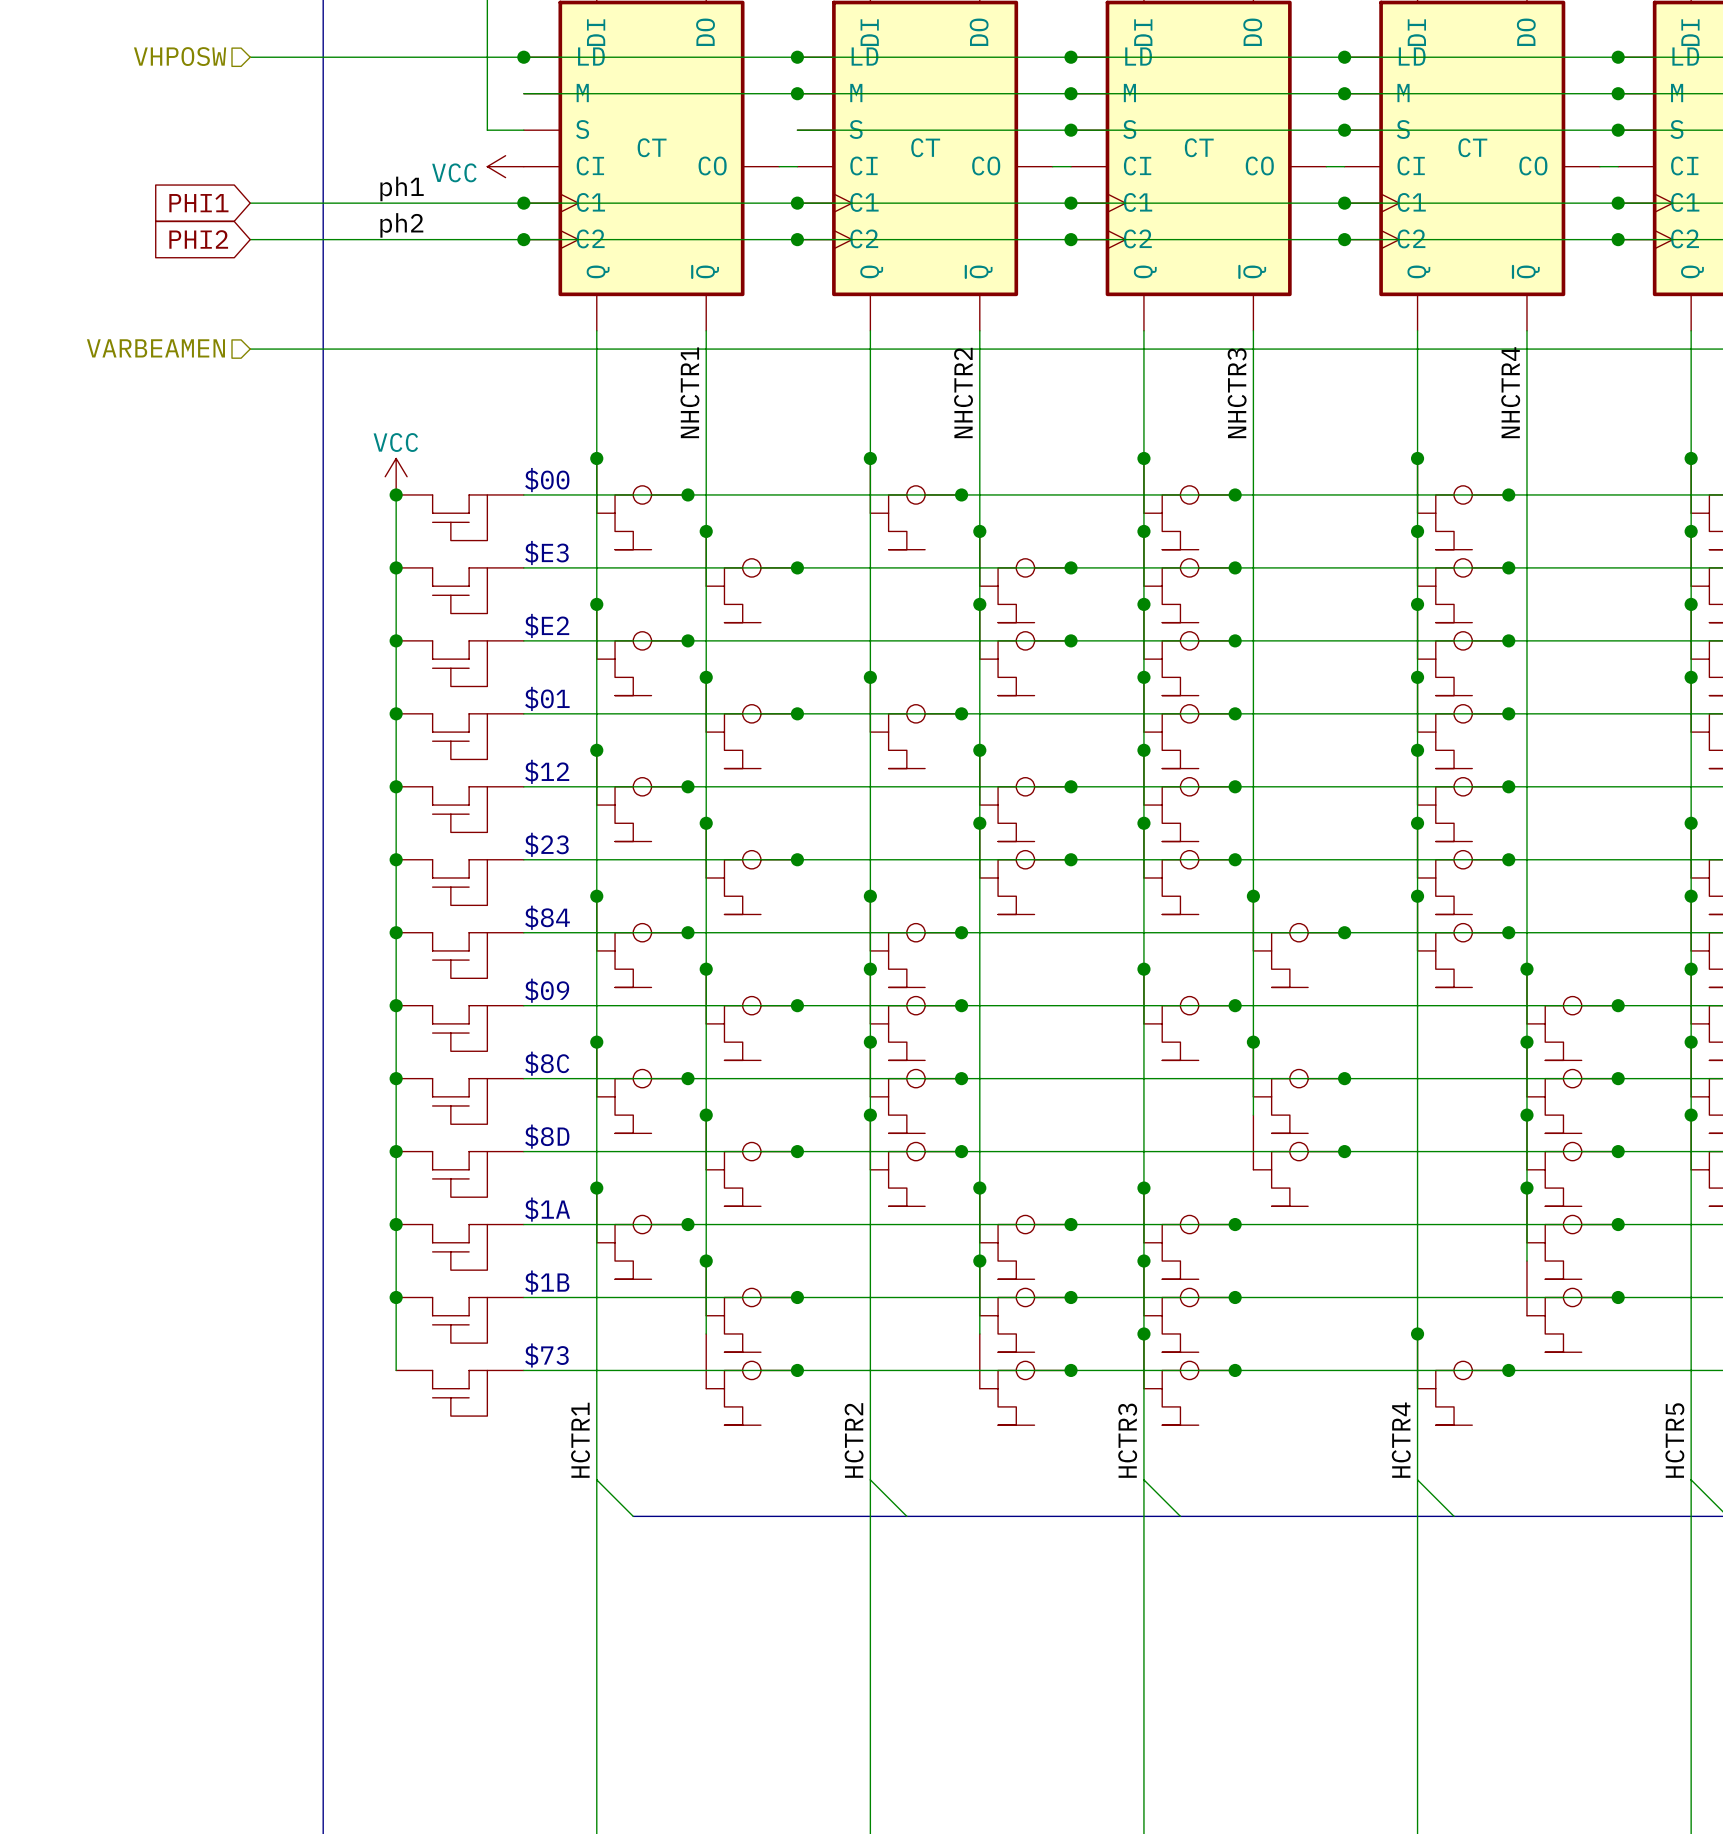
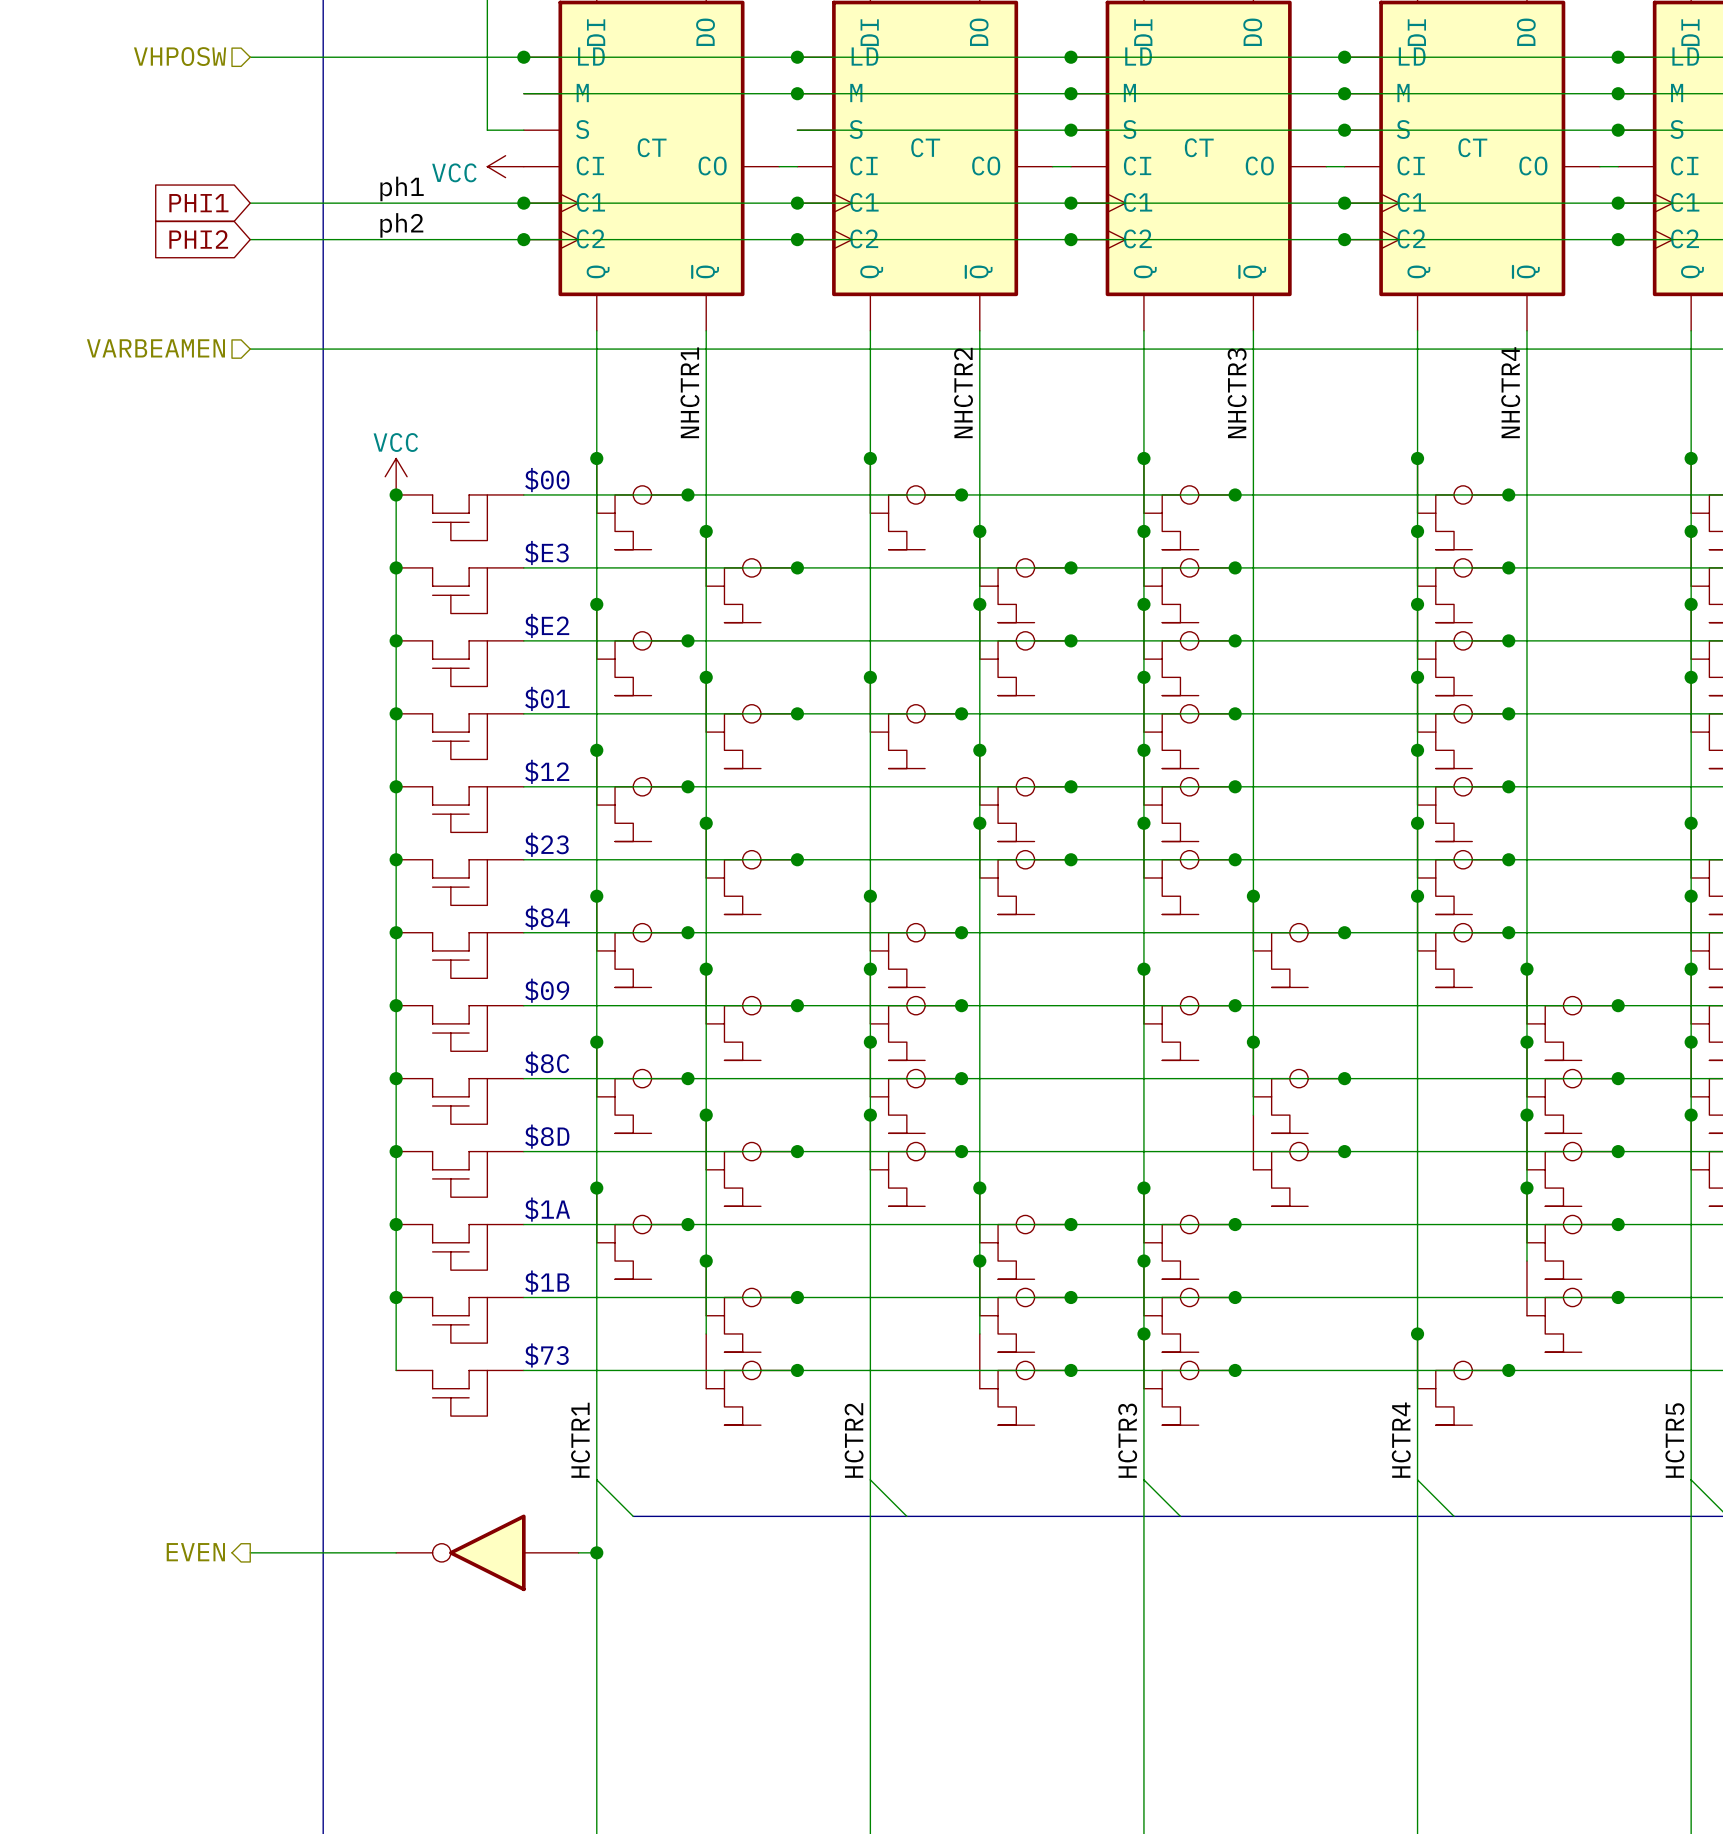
hierarchical label: none -> EVEN (195, 1552)
wire: none -> (250, 1552) (396, 1552)
part: none -> (487, 1552)
wire: none -> (578, 1552) (596, 1552)
junction: none -> (596, 1552)

